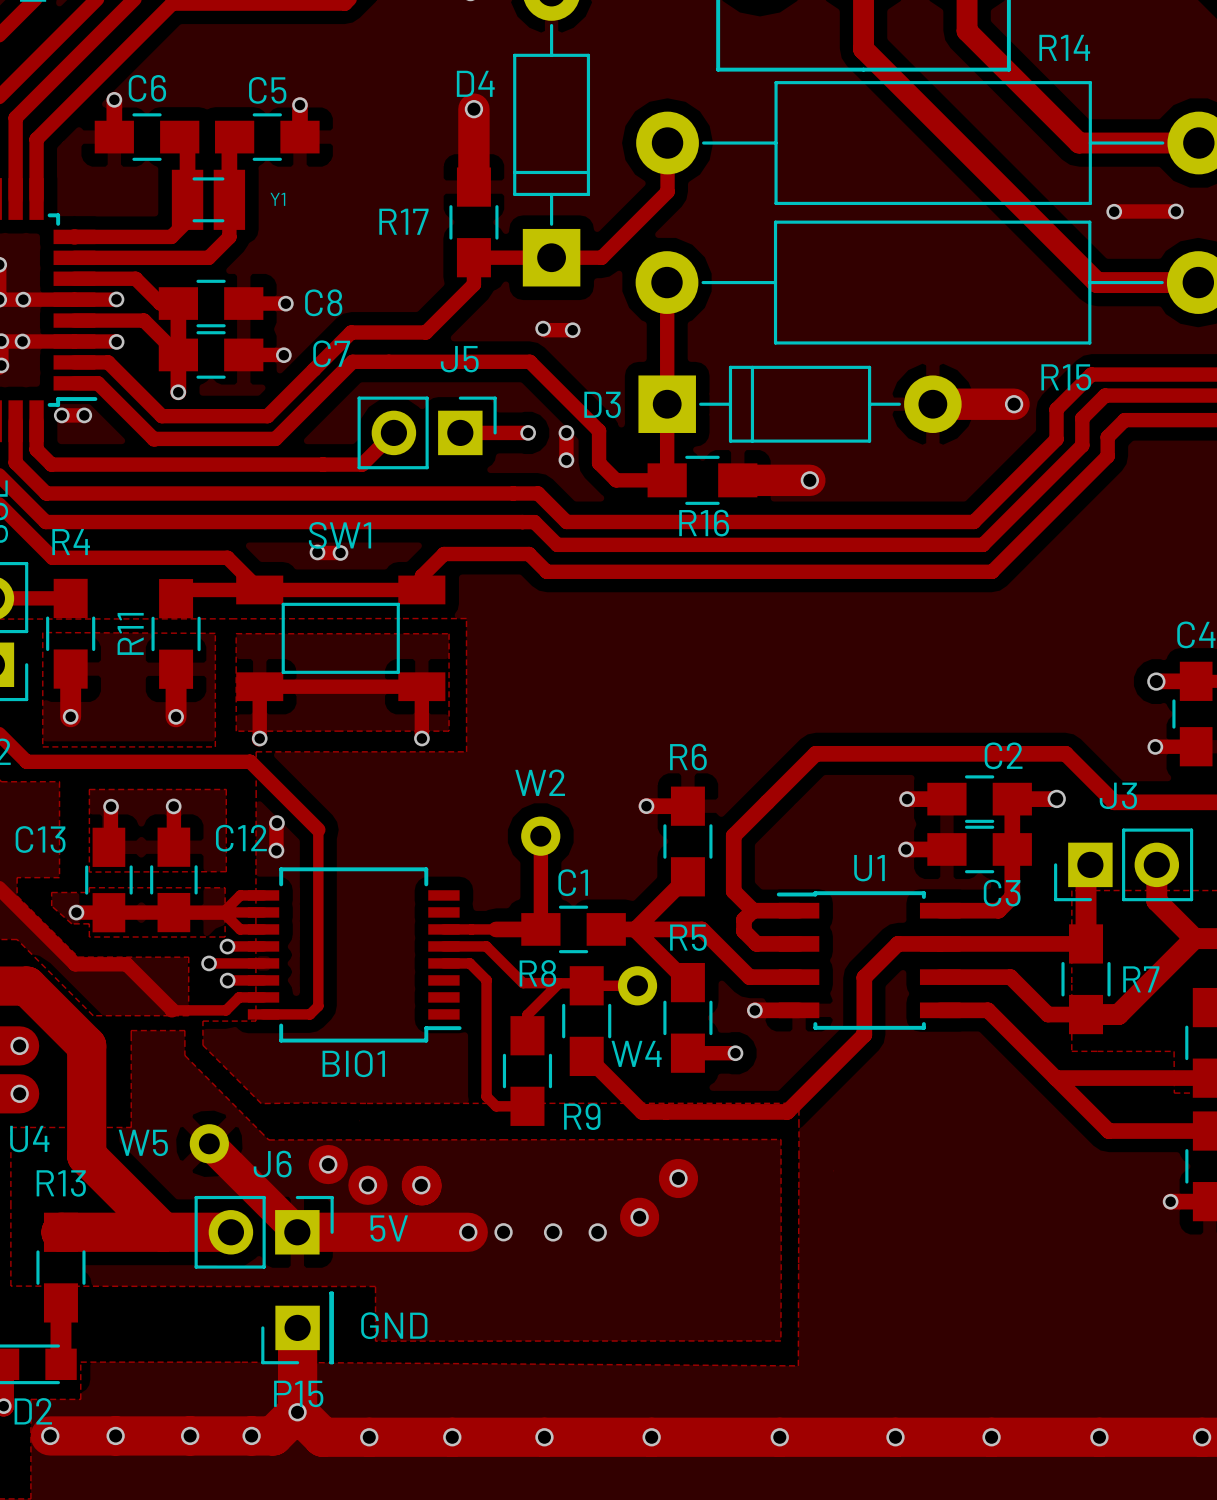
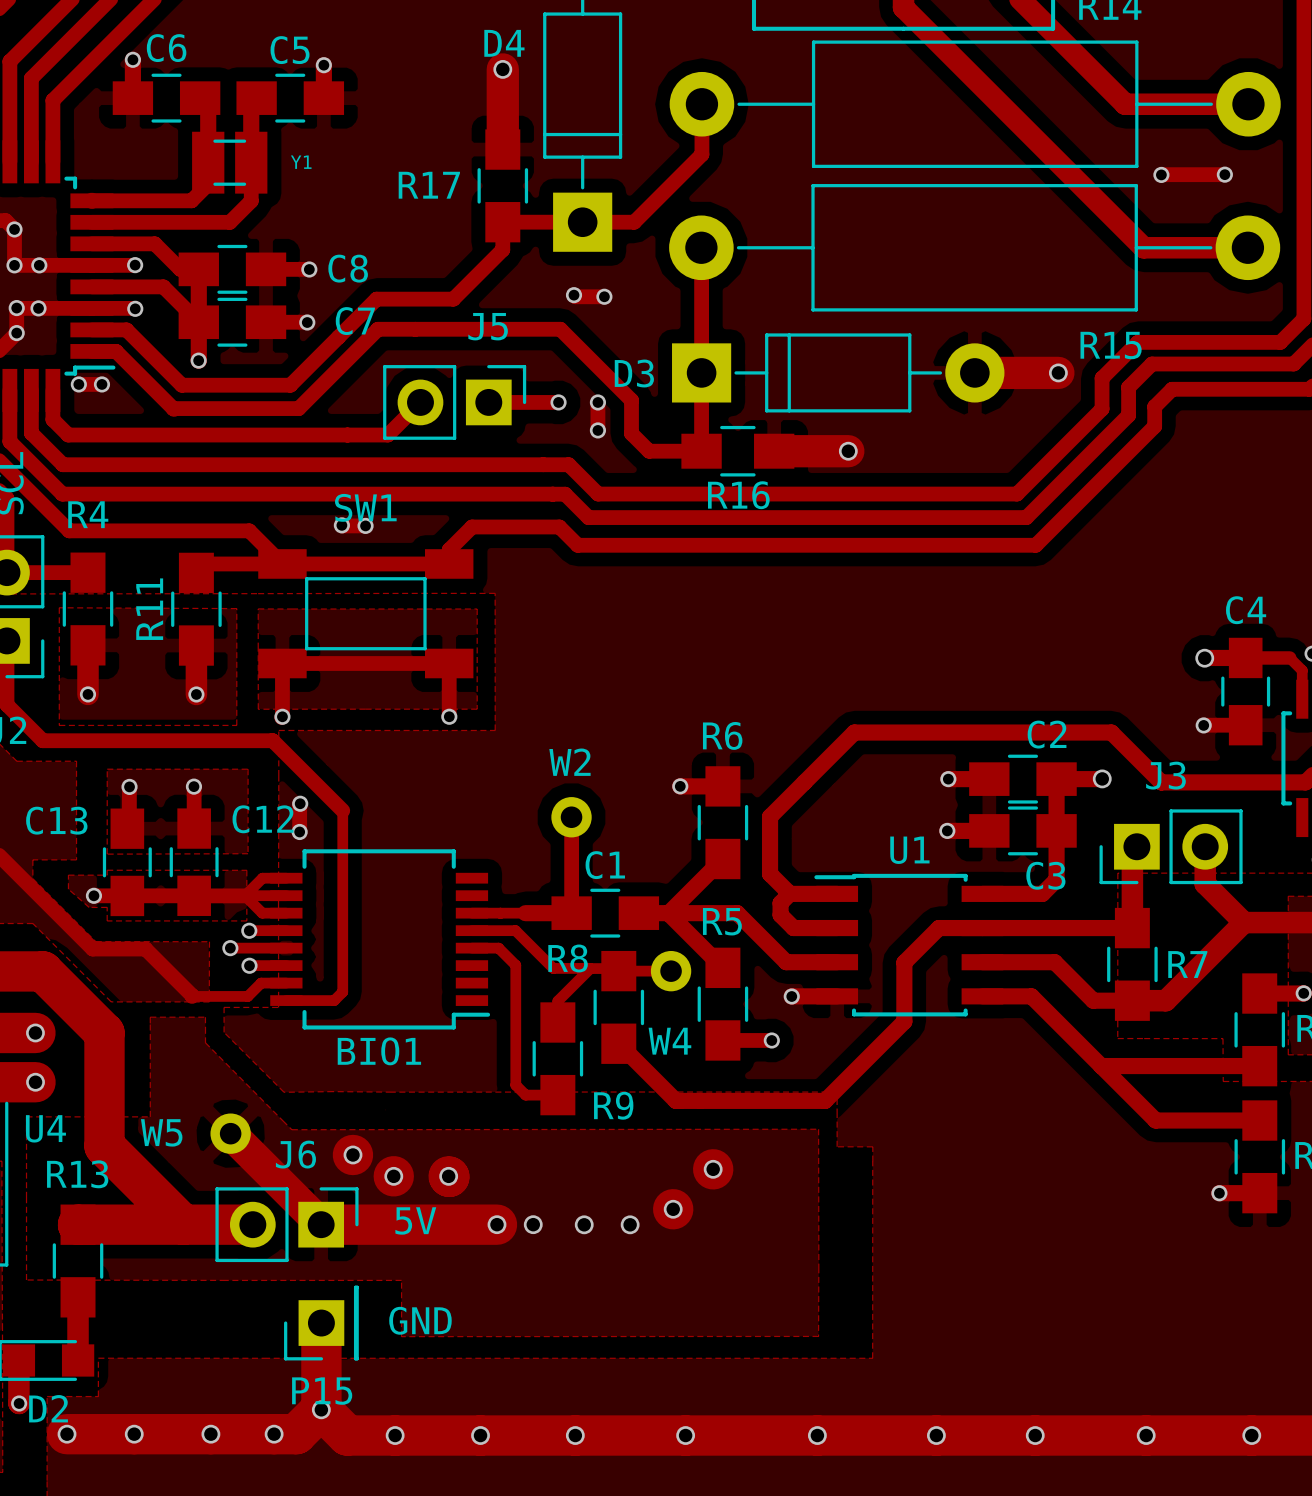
zone outline: (798, 1156) (798, 1365) (241, 1362) -> (837, 1146) (872, 1146) (872, 1358) (264, 1358)

